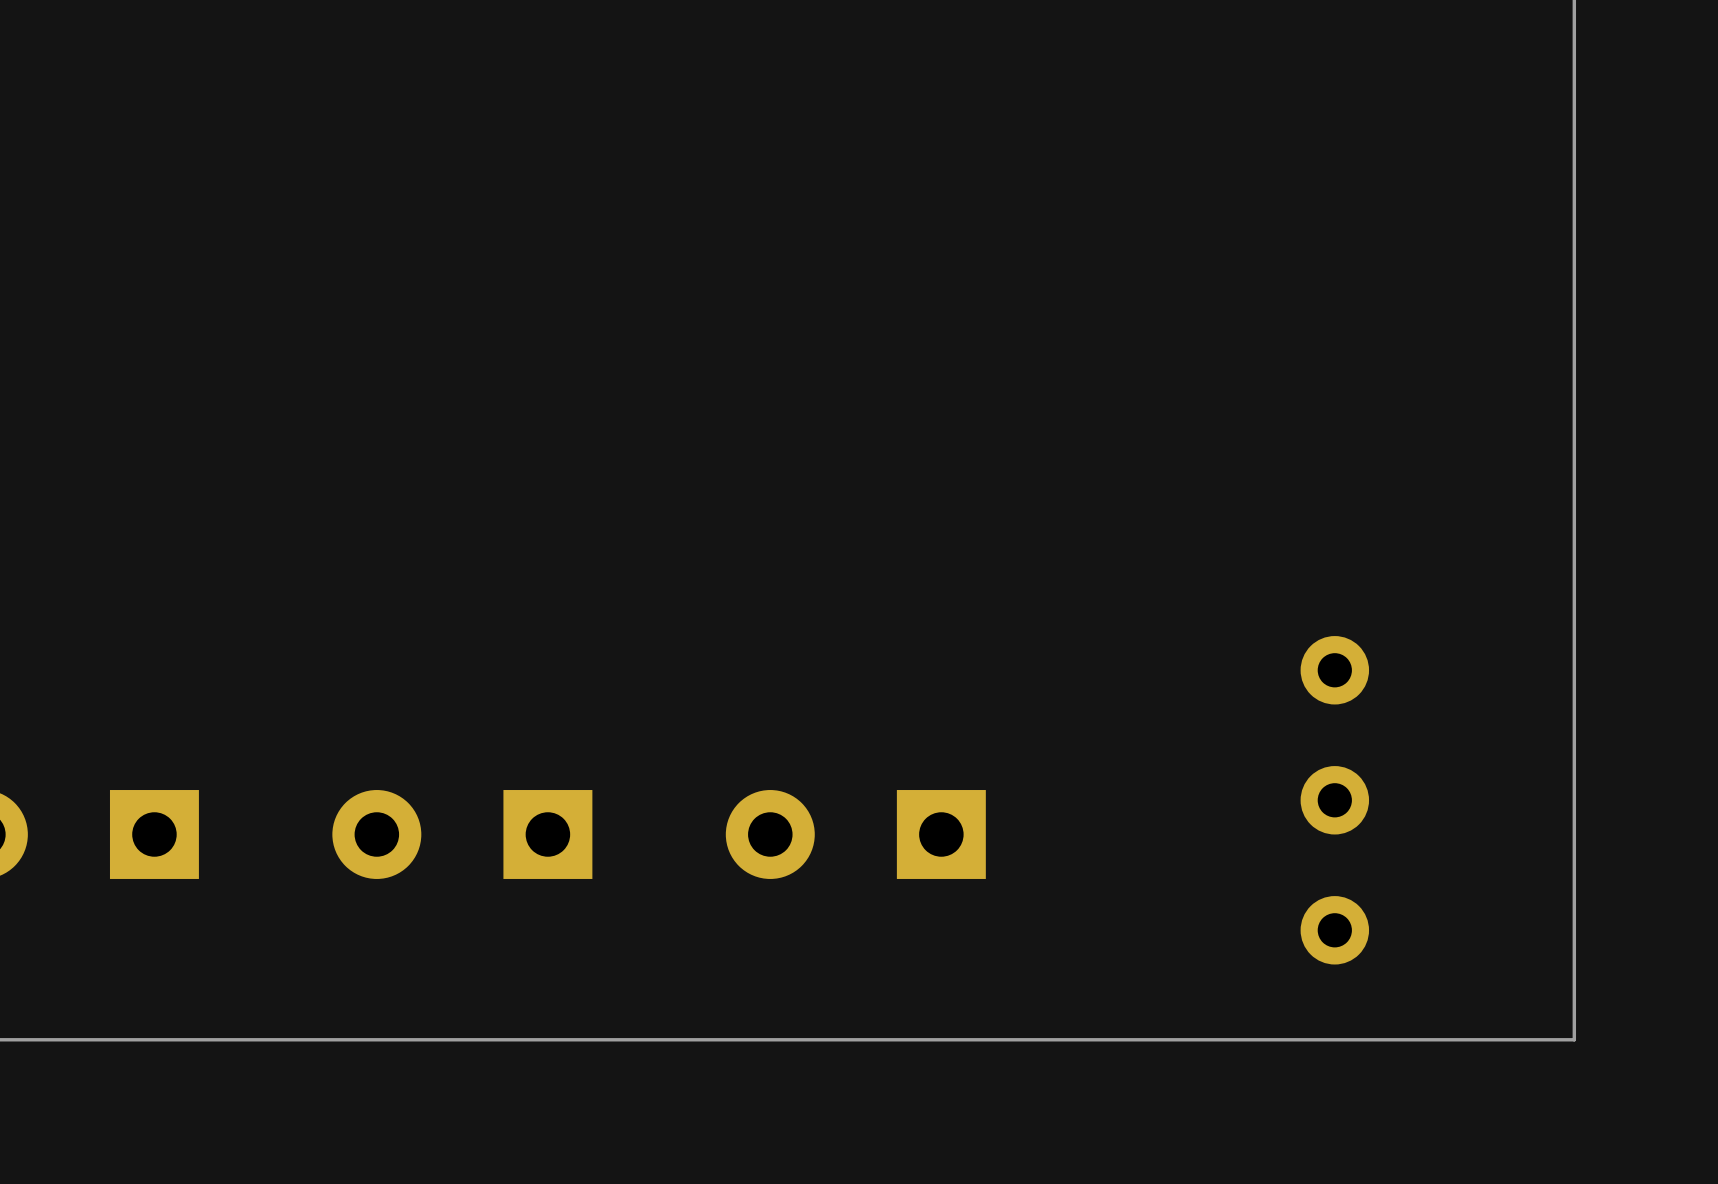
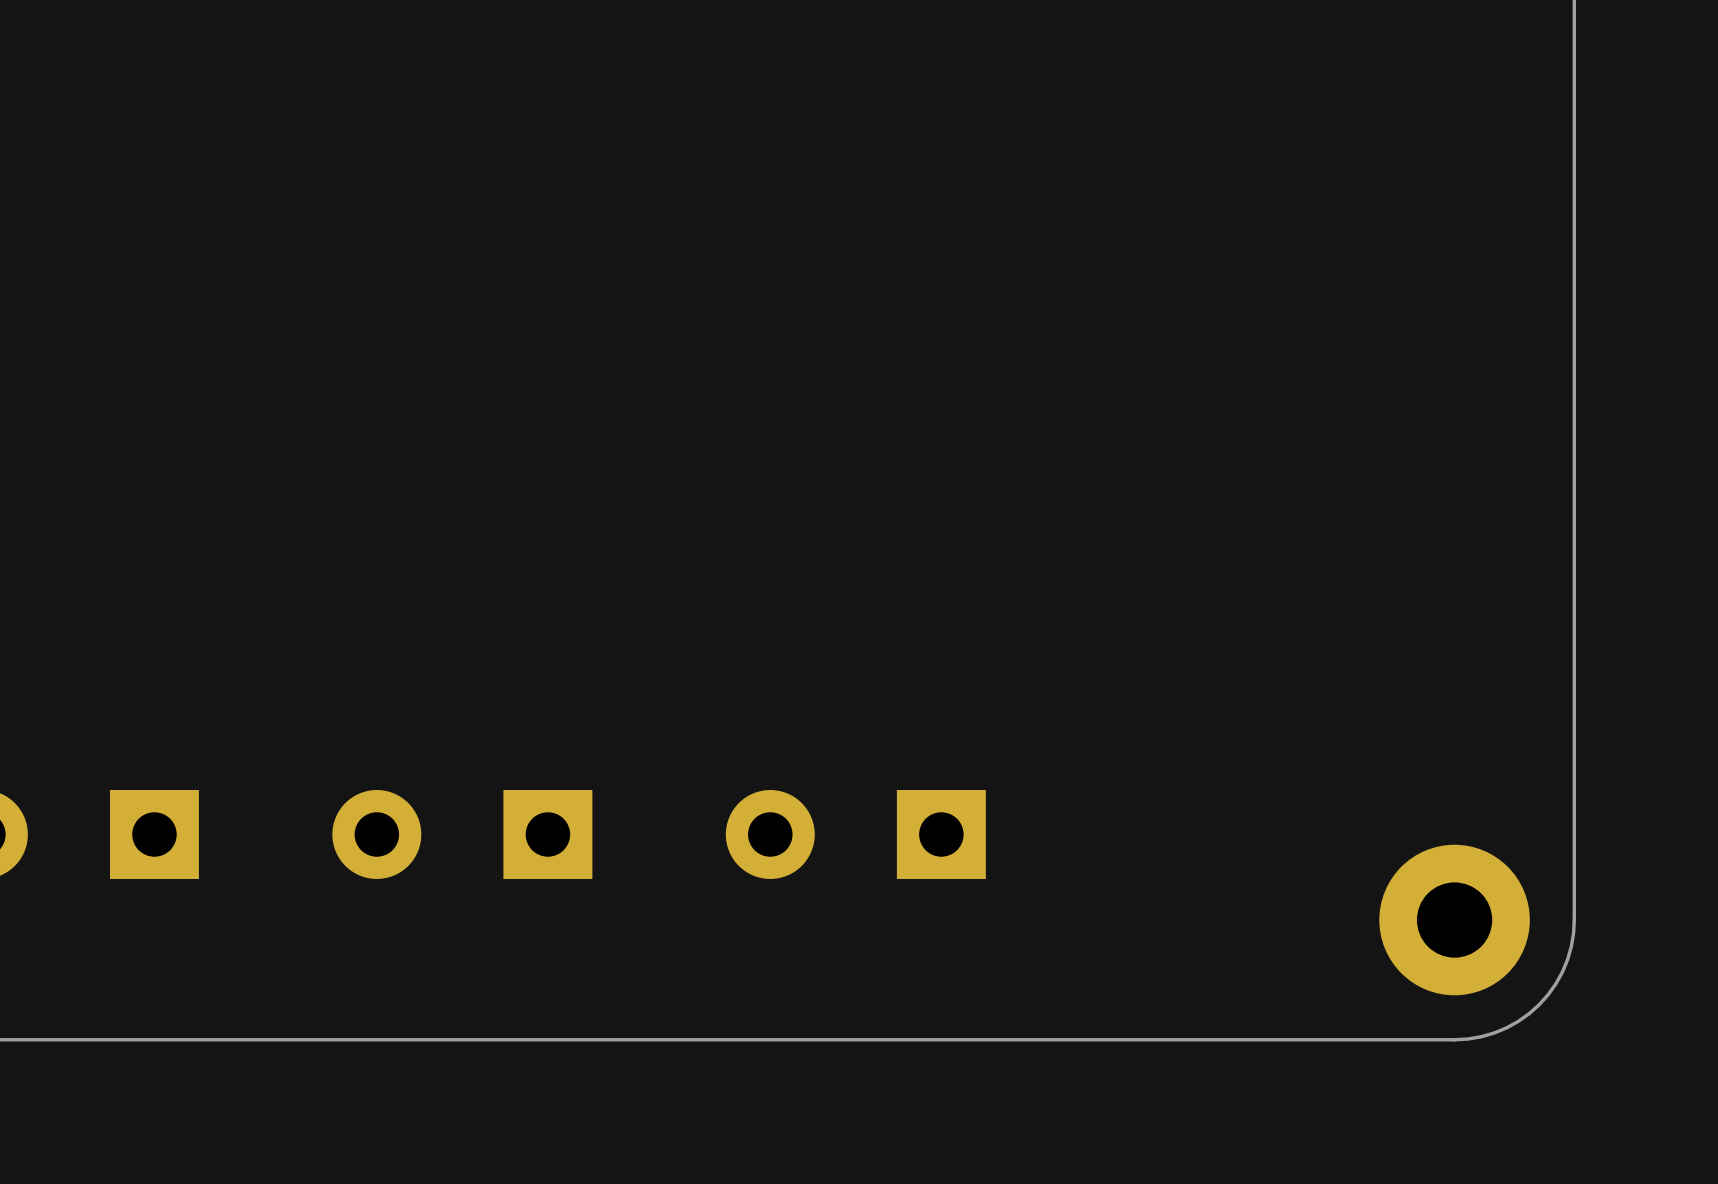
part: (1334, 670) -> none
part: (1334, 800) -> none
part: none -> (1454, 920)
board edge: (1574, 920) (1574, 1039) (1454, 1039) -> (1574, 920) (1571, 946) (1562, 971) (1555, 983) (1539, 1004) (1518, 1021) (1494, 1033) (1467, 1039) (1454, 1039)
part: (1334, 930) -> none

